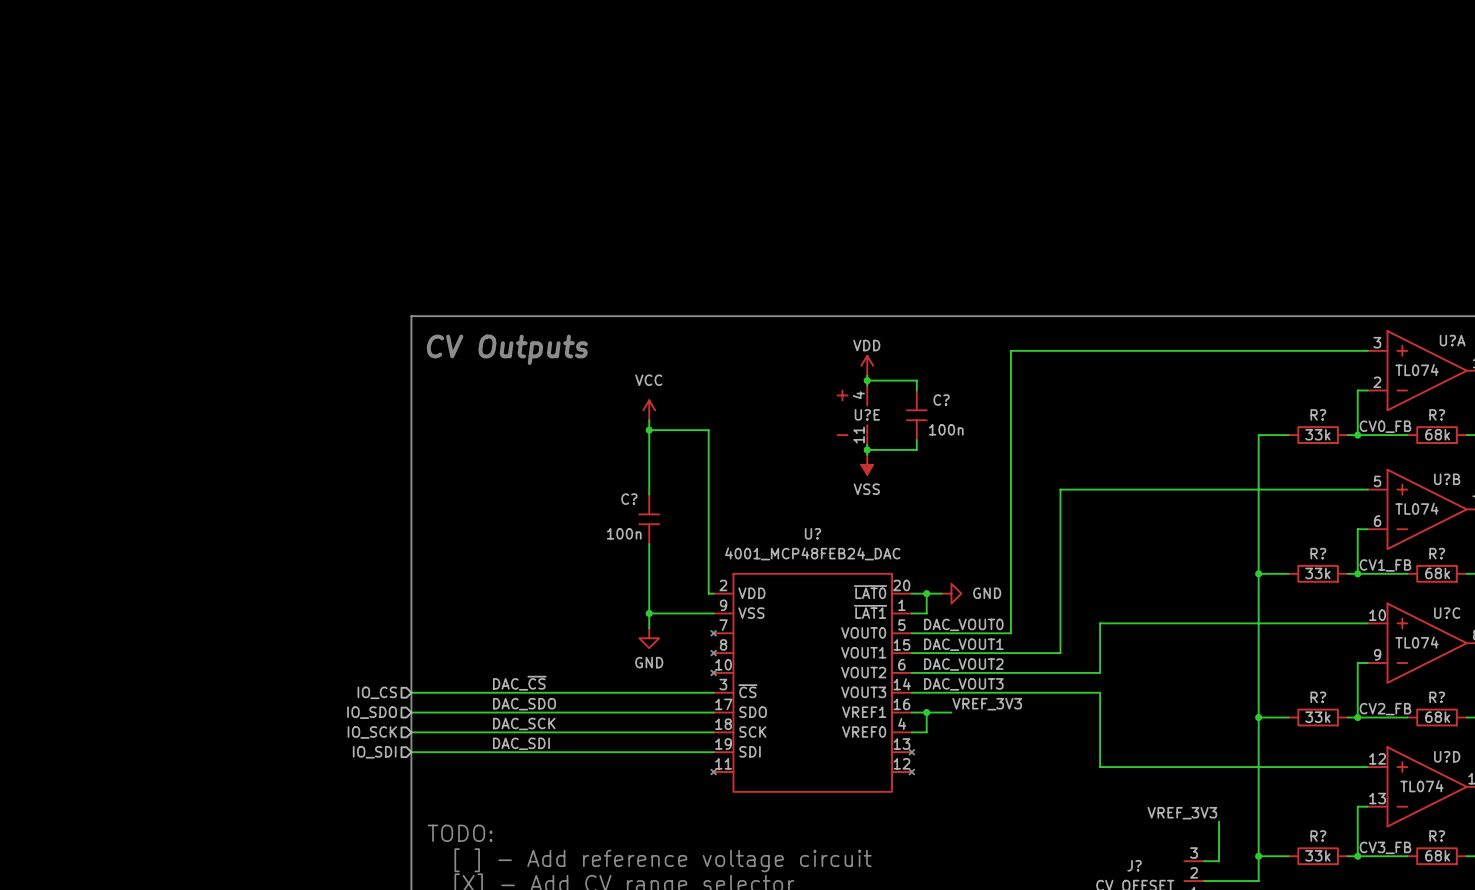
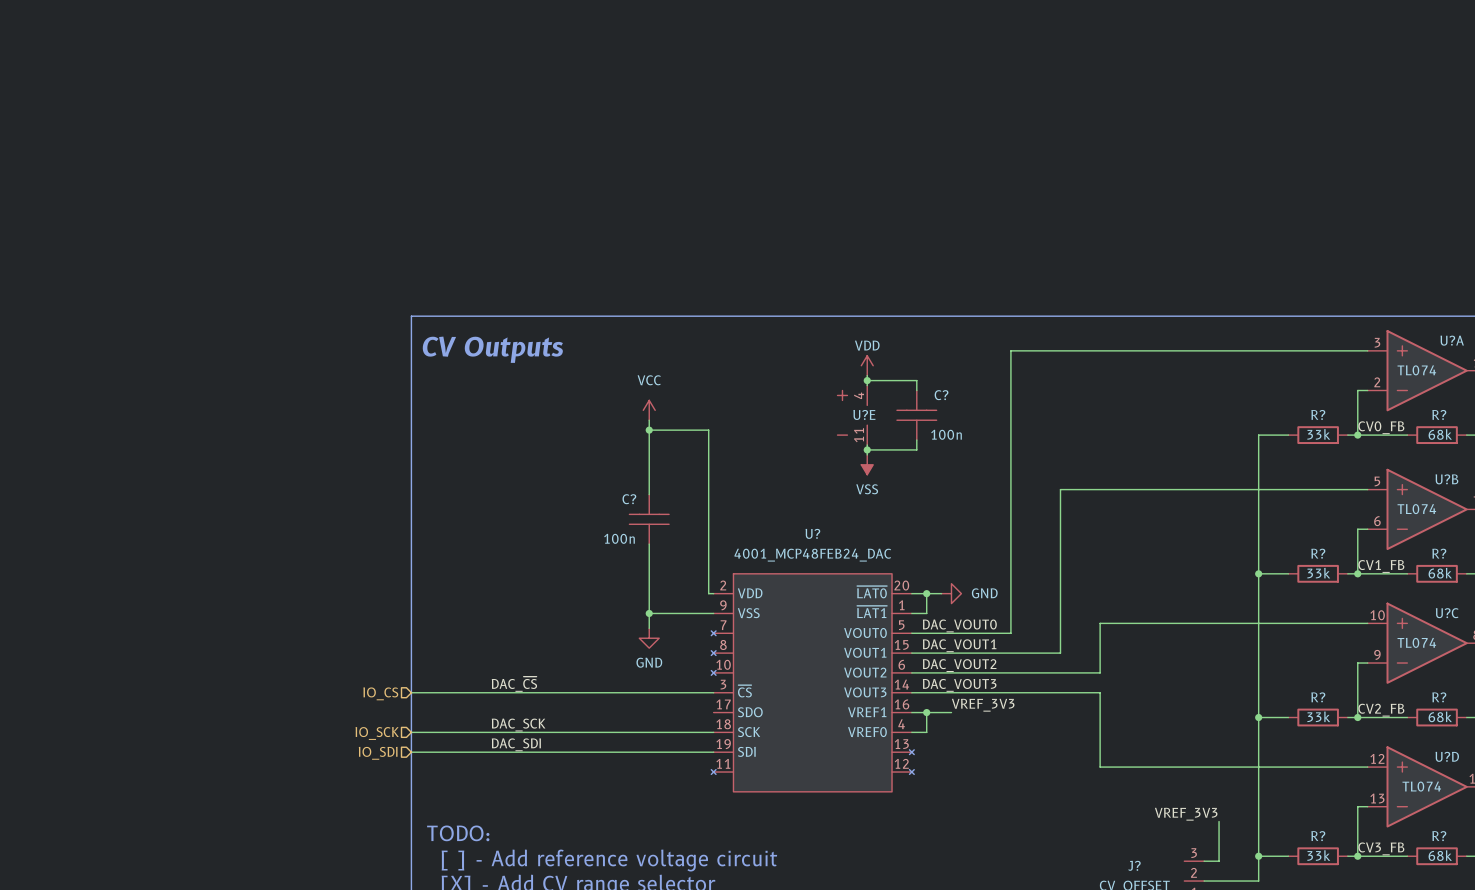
C? symbol: [906, 390, 927, 441] -> [896, 390, 937, 441]
C? symbol: [639, 494, 660, 545] -> [629, 494, 670, 545]
label: DAC_SDO (524, 704) -> none
hierarchical label: IO_SDO (372, 712) -> none
wire: (411, 712) (713, 712) -> none

